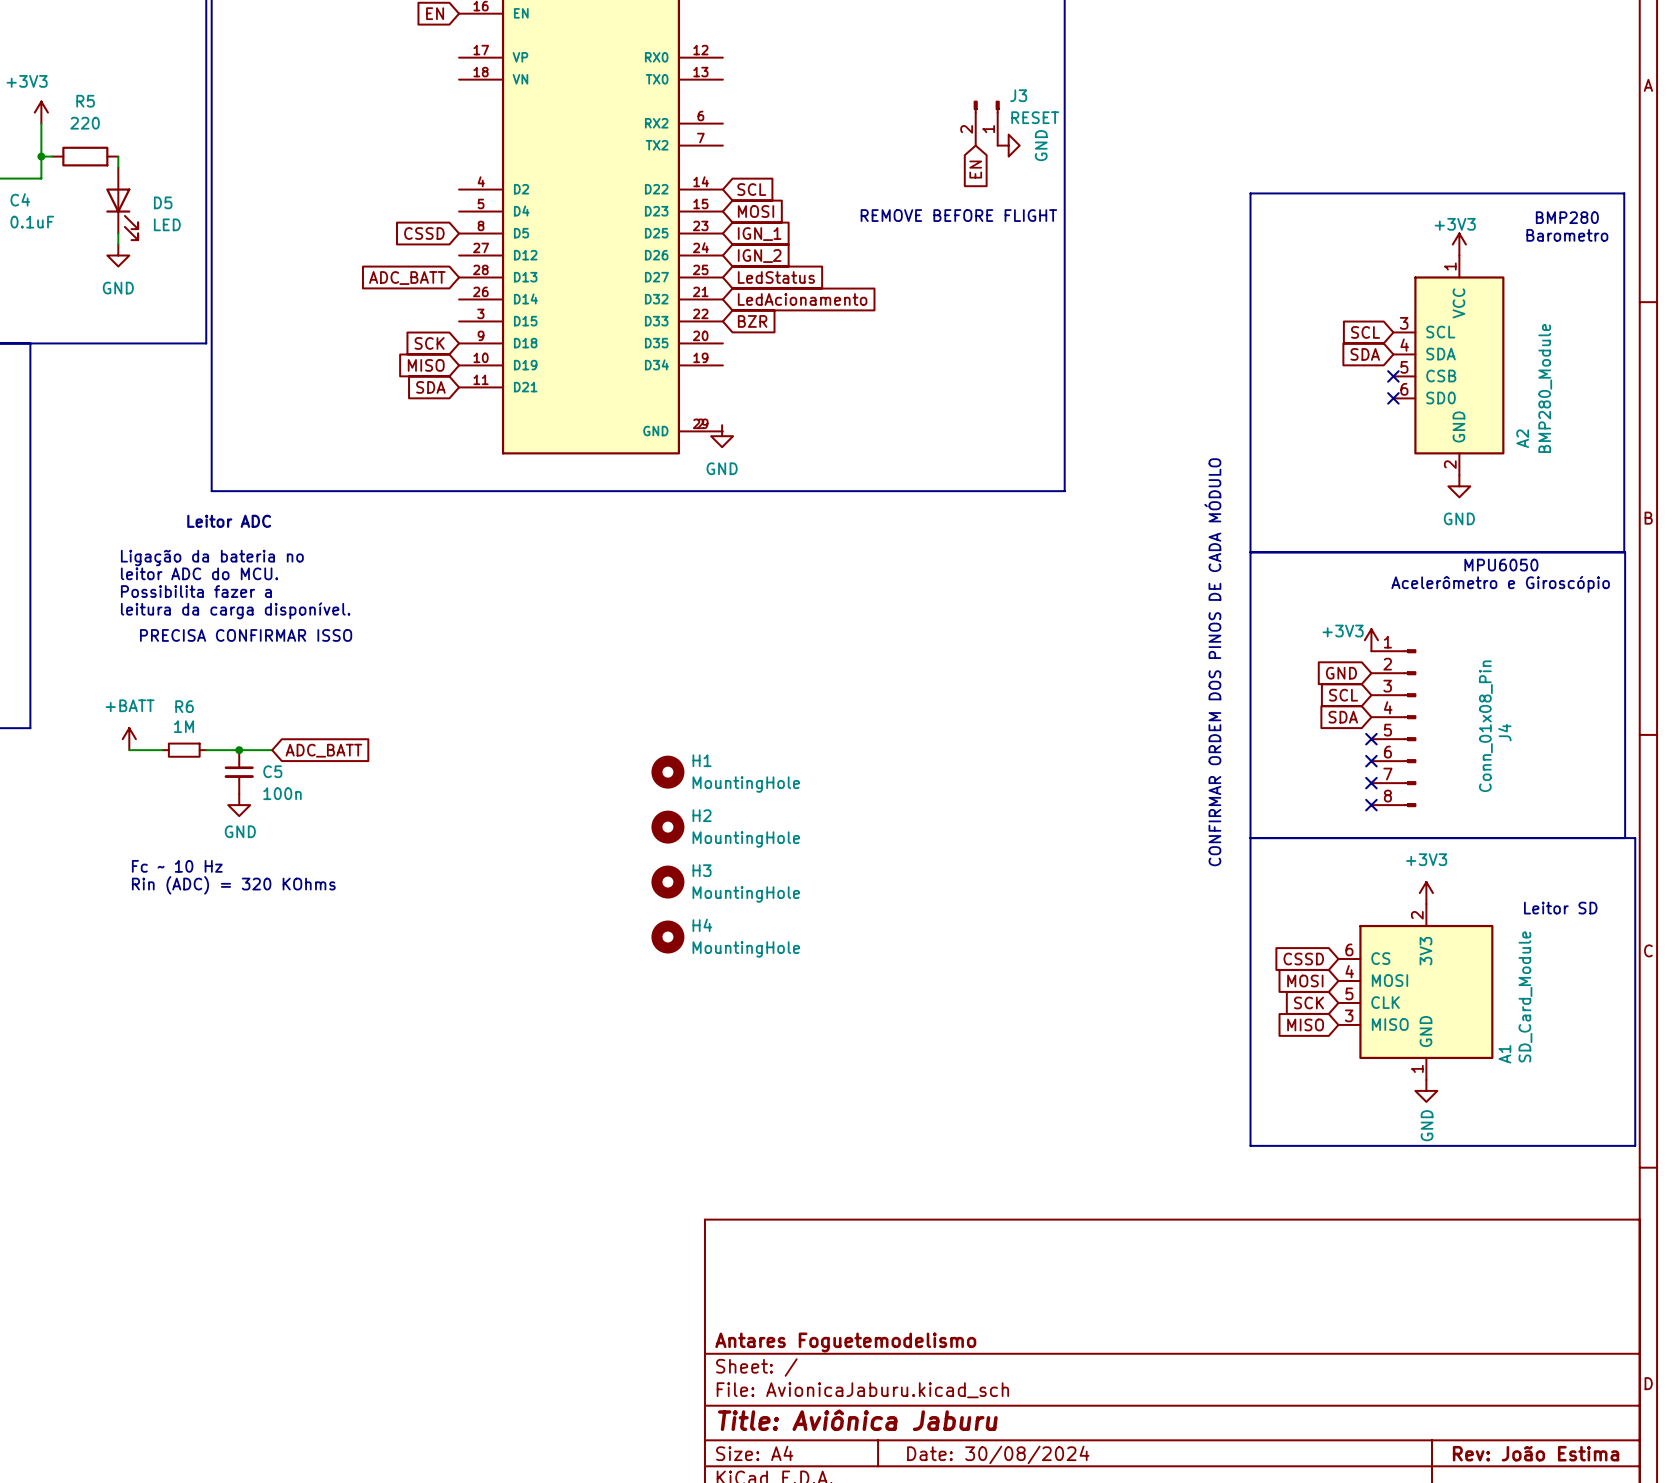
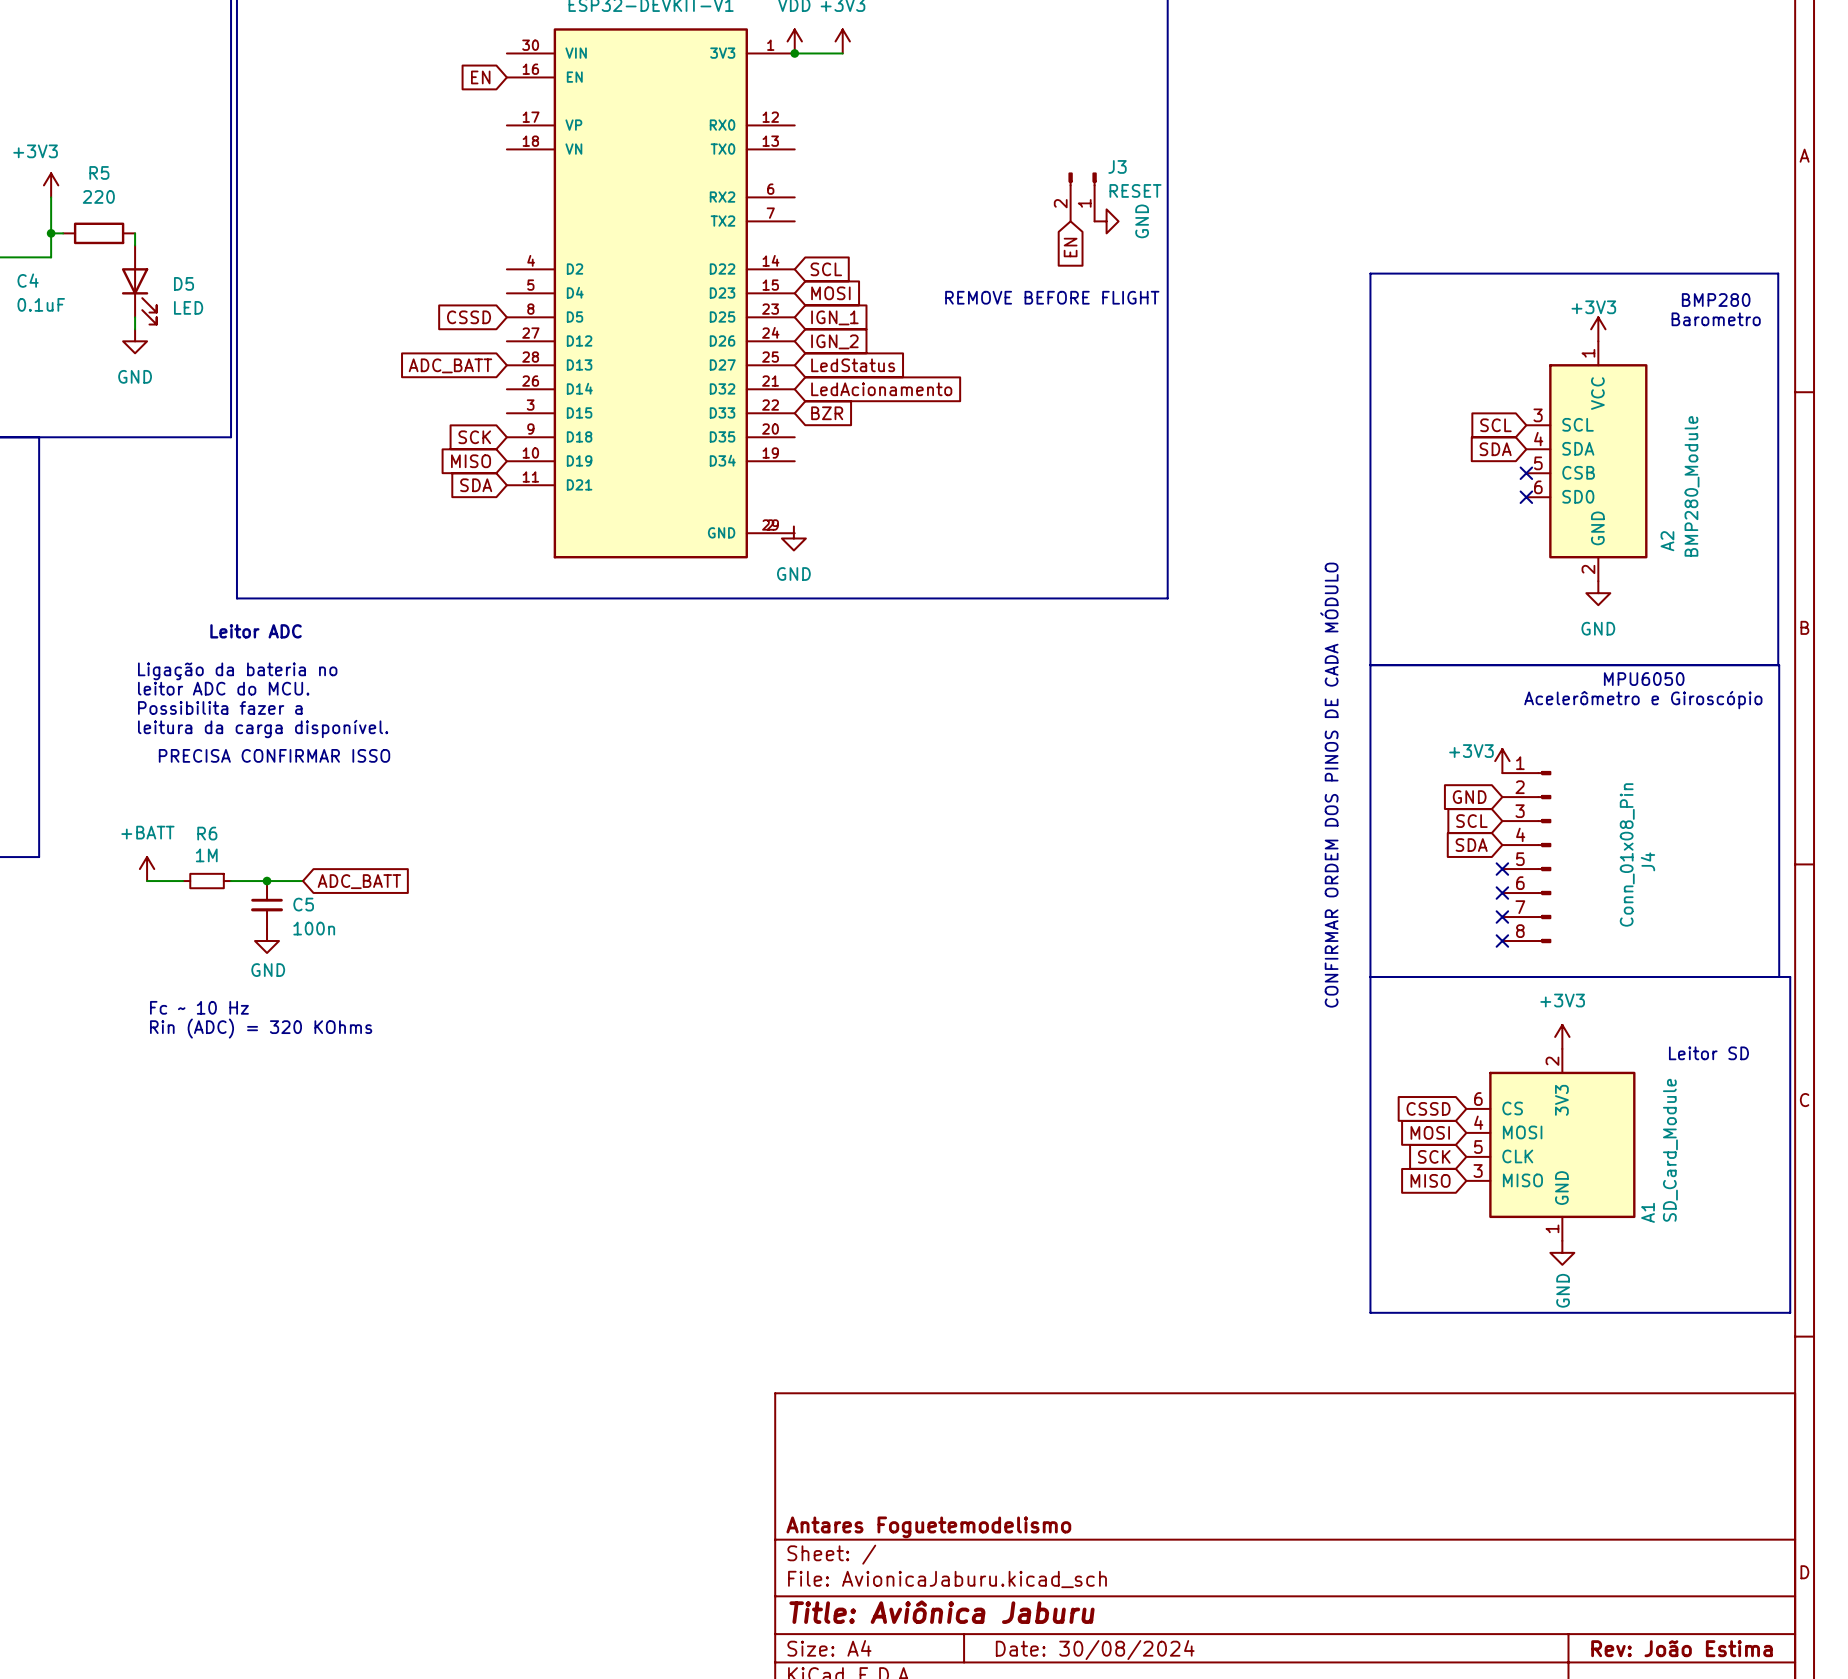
H1: MountingHole (667, 772) -> none
H2: MountingHole (667, 827) -> none
H3: MountingHole (667, 882) -> none
H4: MountingHole (667, 937) -> none

